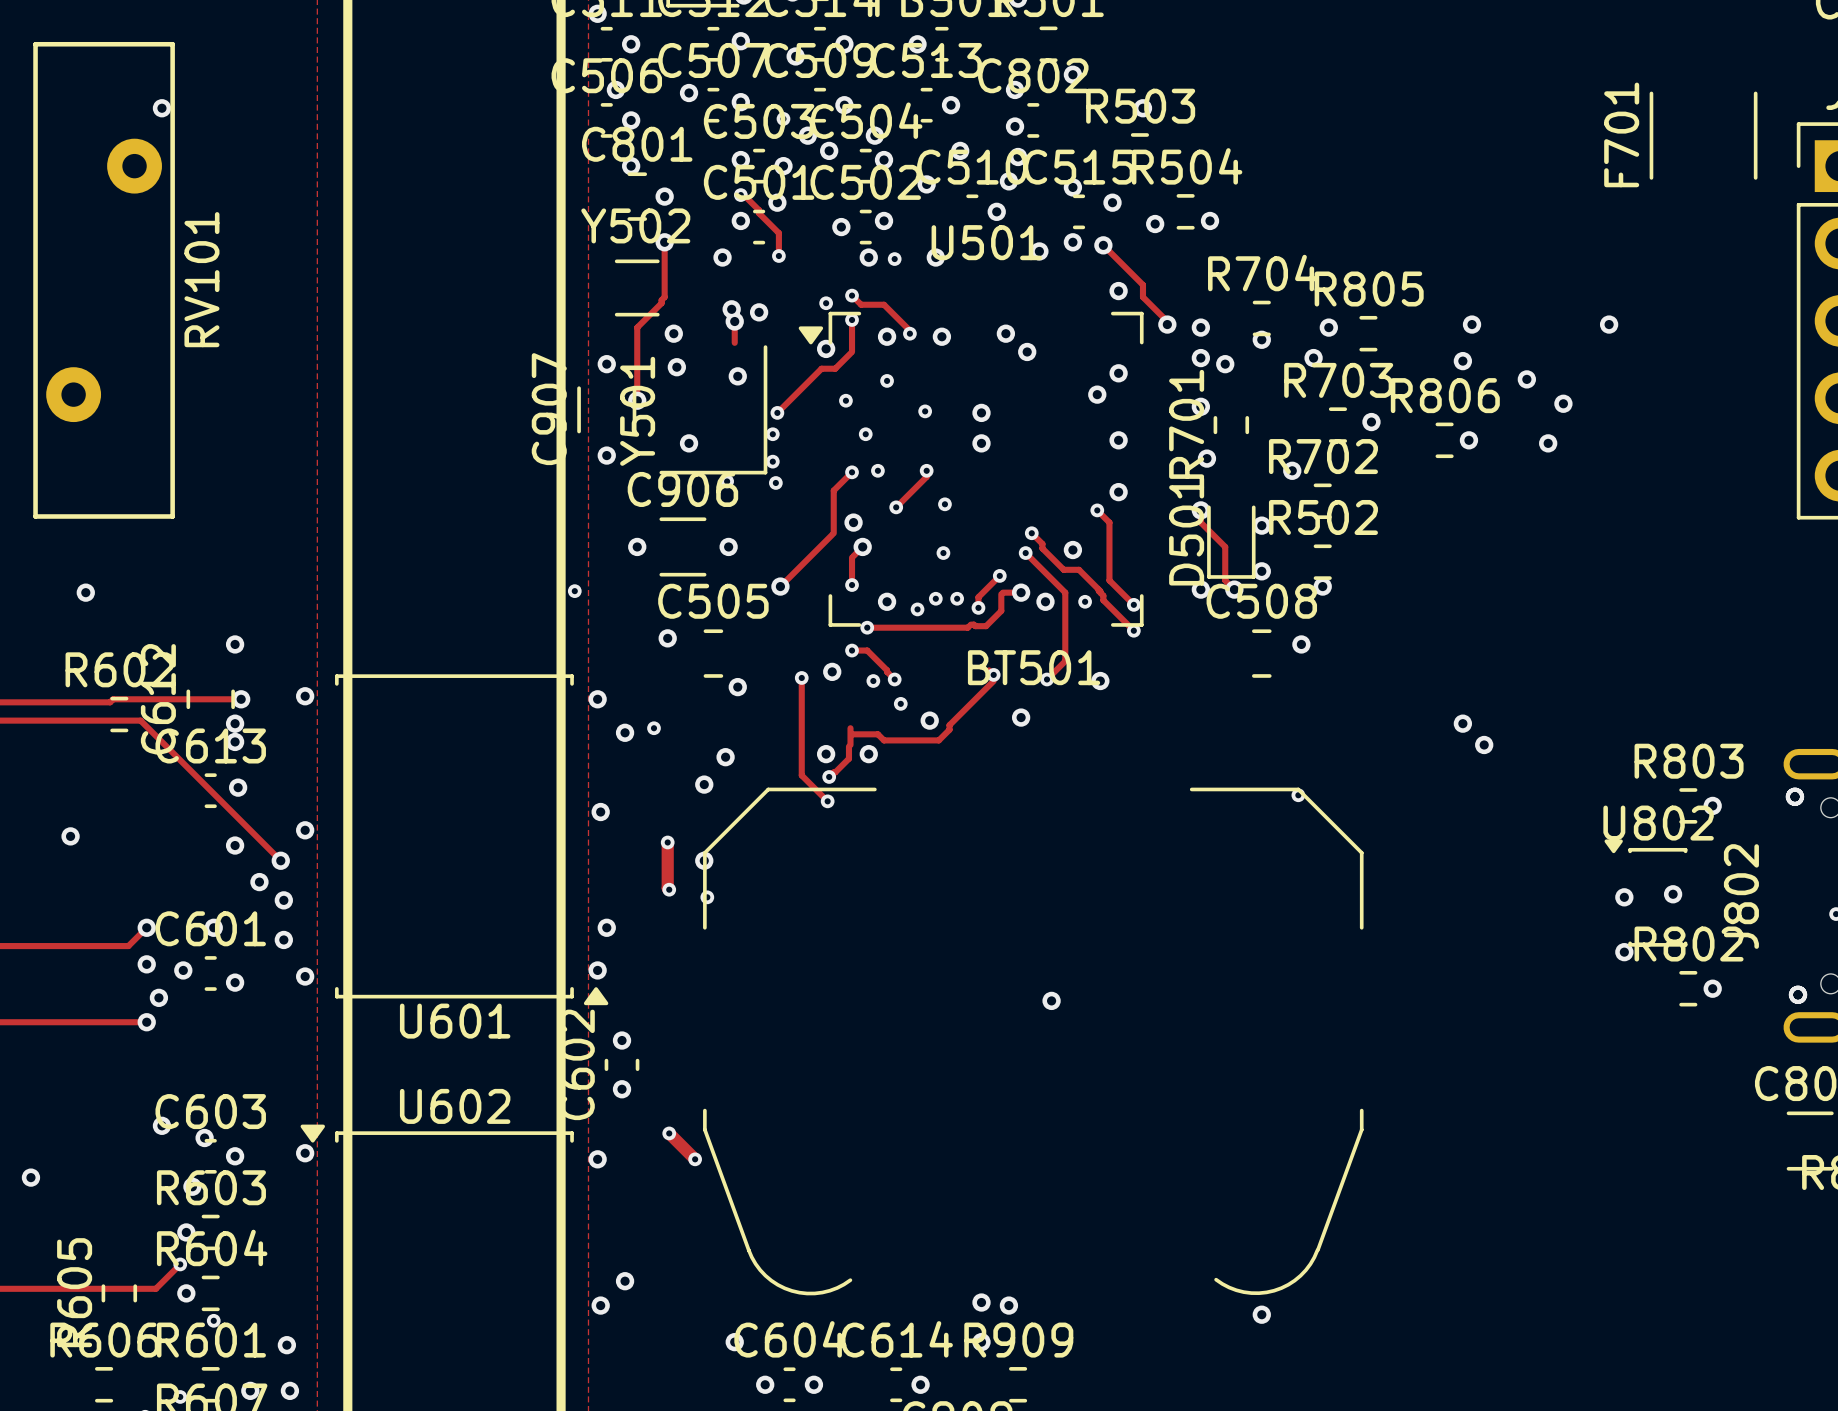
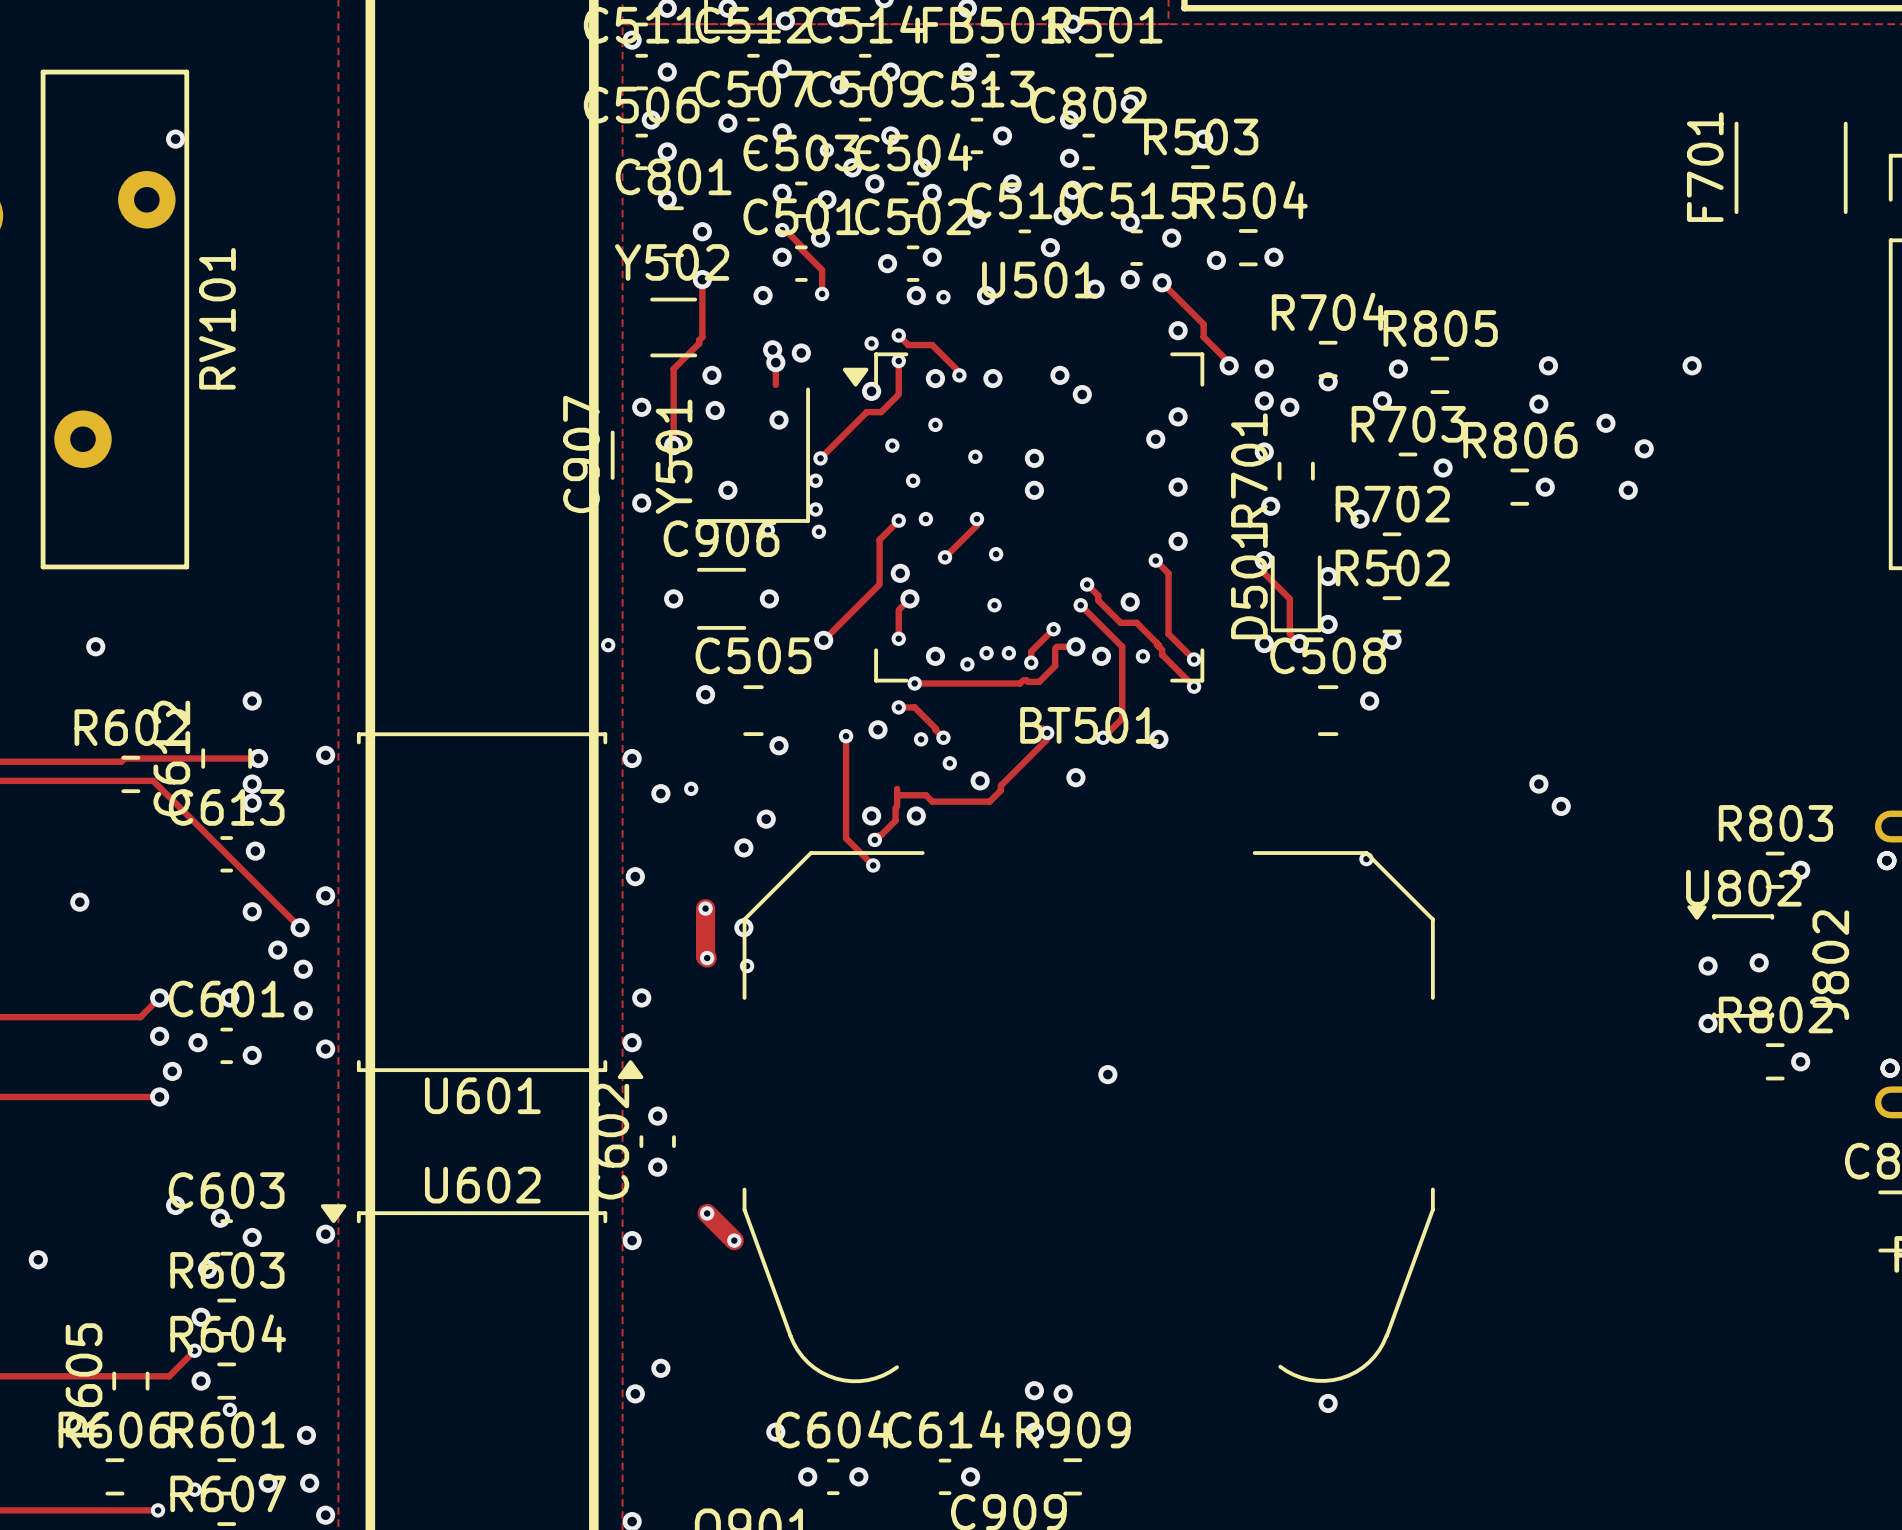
track width: thin (667, 842) (669, 889) -> thick (705, 908) (705, 956) (707, 958)
track width: thin (669, 1133) (695, 1159) -> thick (707, 1213) (734, 1240)

